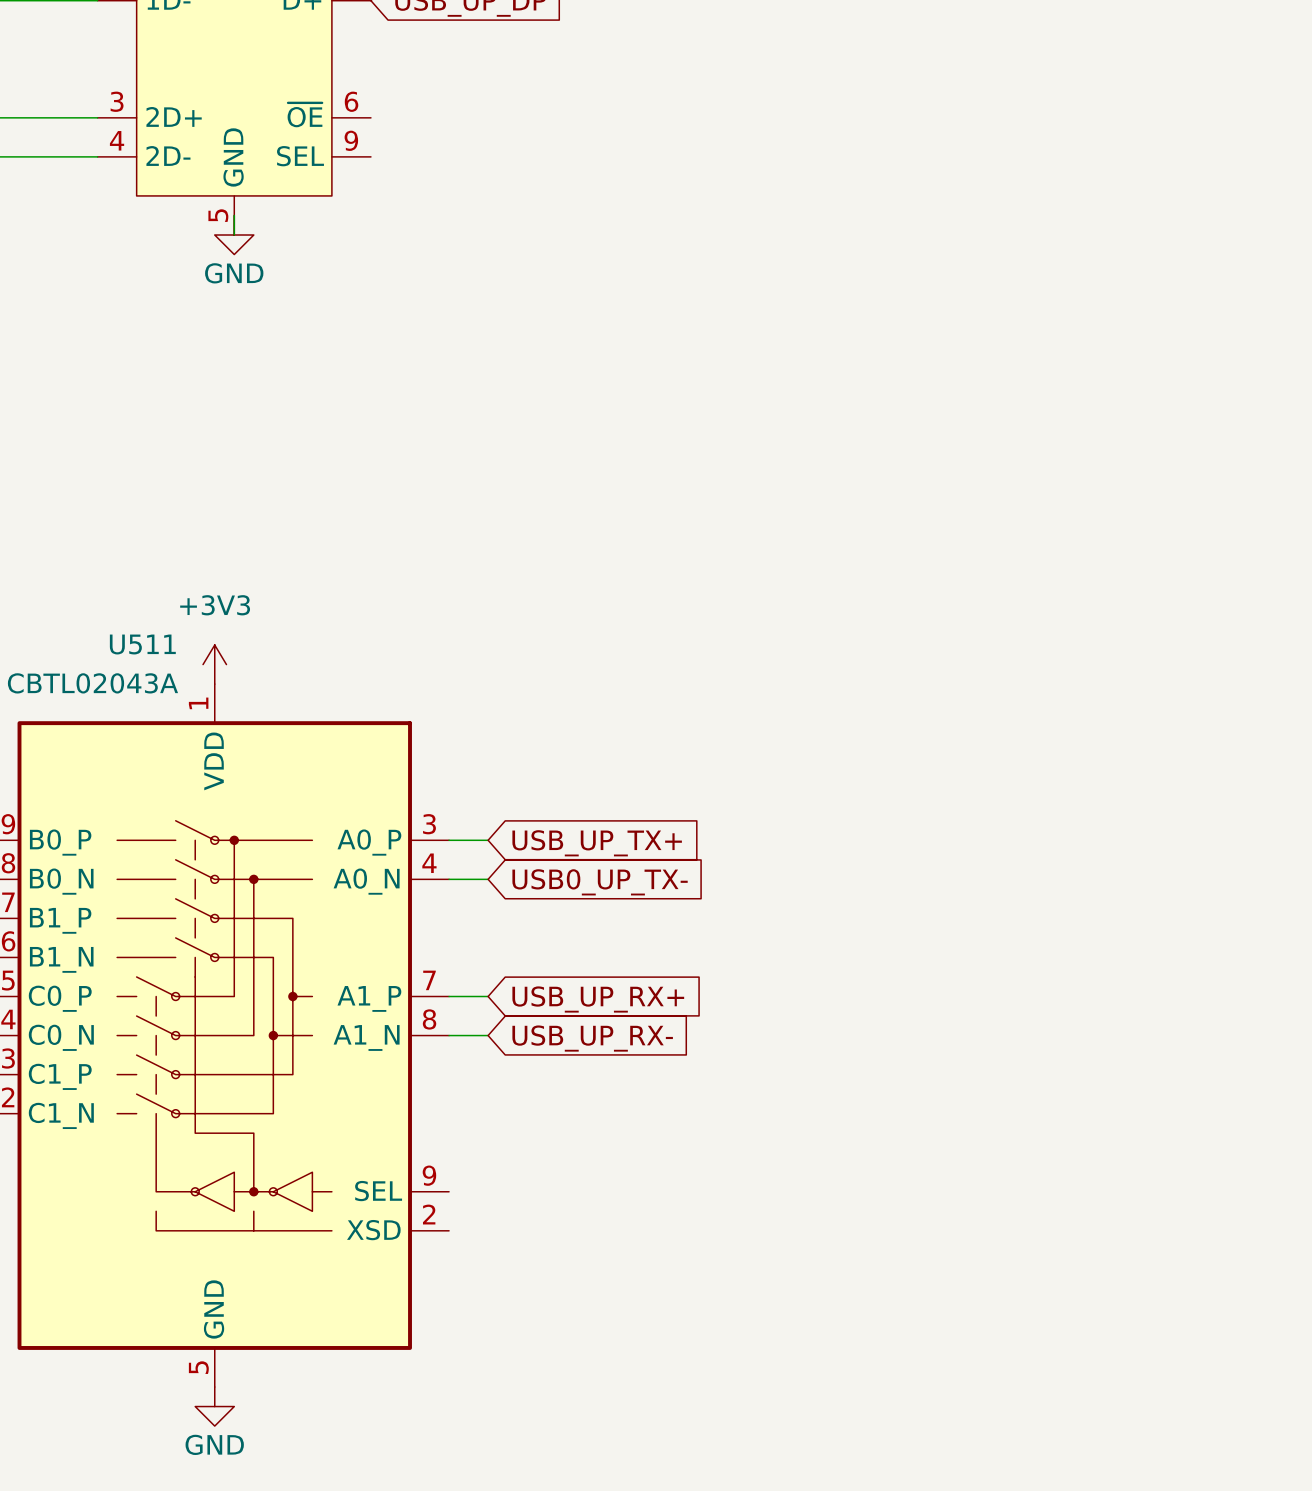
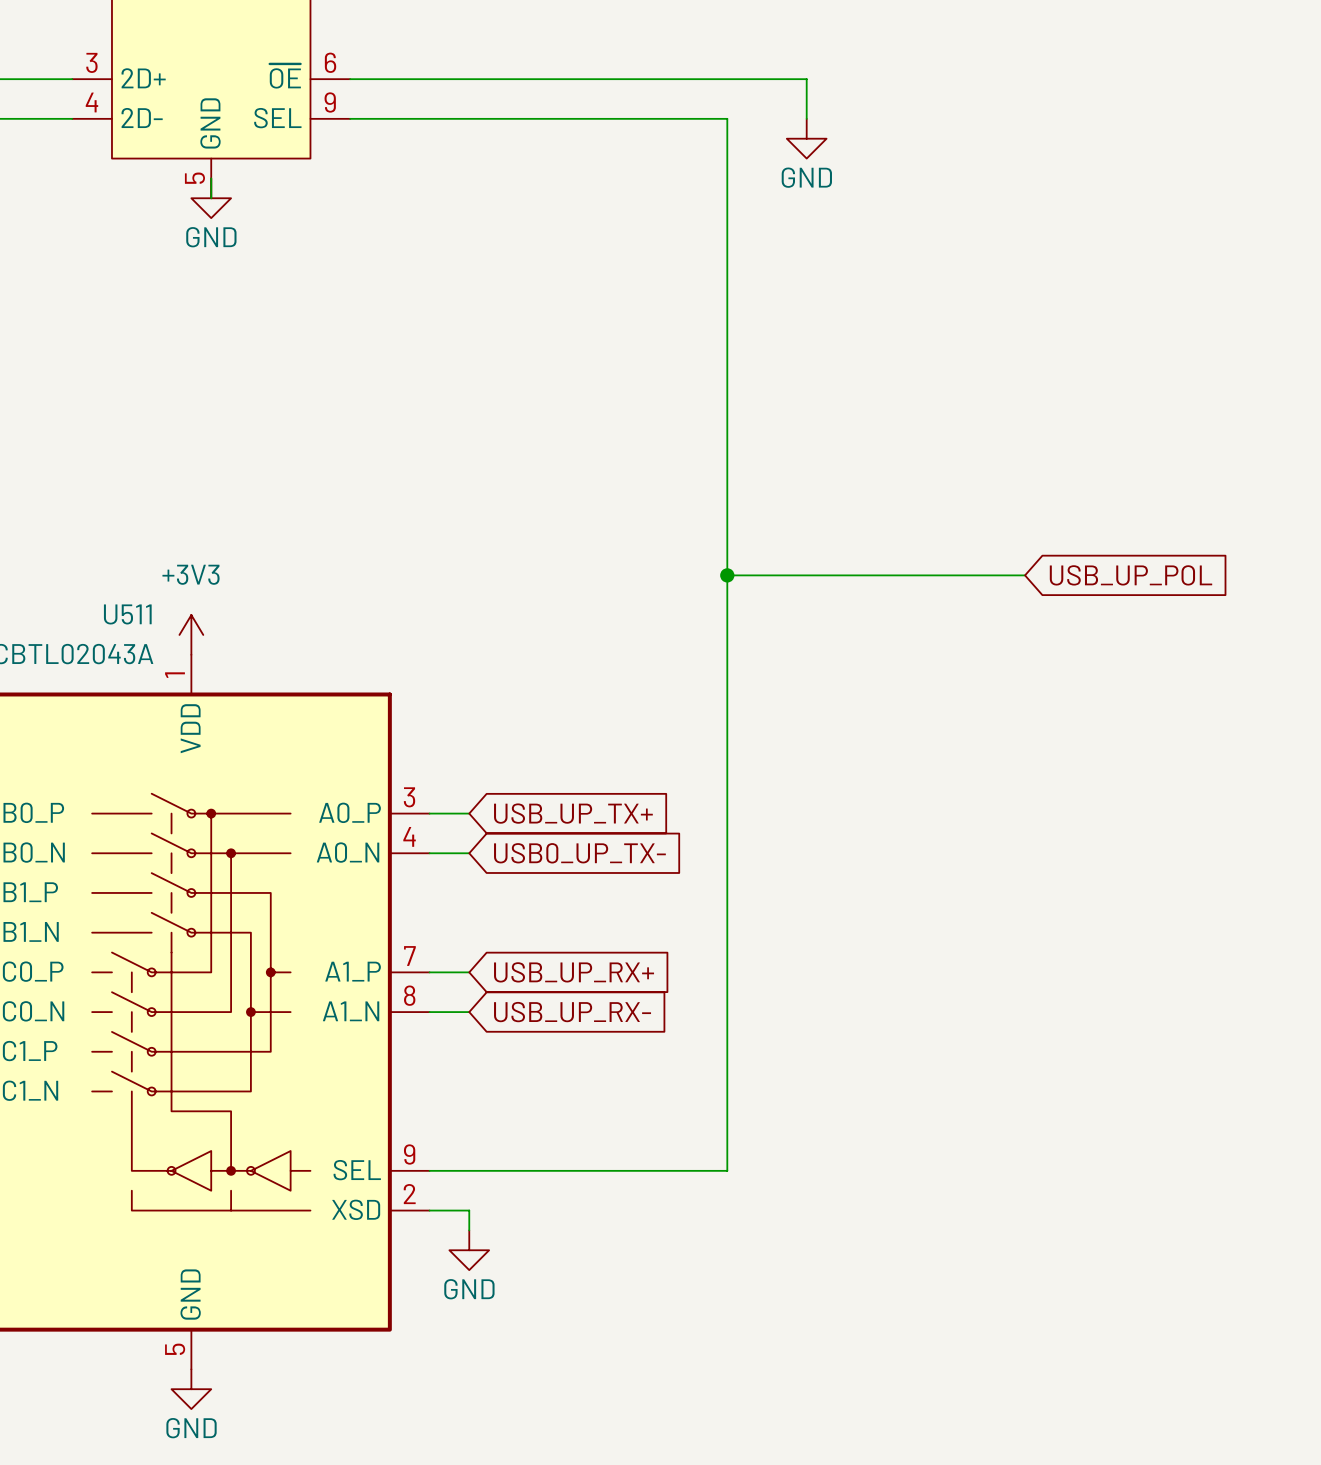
wire: none -> (350, 79) (806, 79) (806, 118)
wire: none -> (350, 118) (727, 118) (727, 1170) (429, 1170)
power symbol: none -> GND (806, 138)
wire: none -> (727, 575) (1025, 575)
junction: none -> (727, 575)
global label: none -> USB_UP_POL (1131, 575)
wire: none -> (429, 1210) (469, 1210) (469, 1230)
power symbol: none -> GND (469, 1250)

